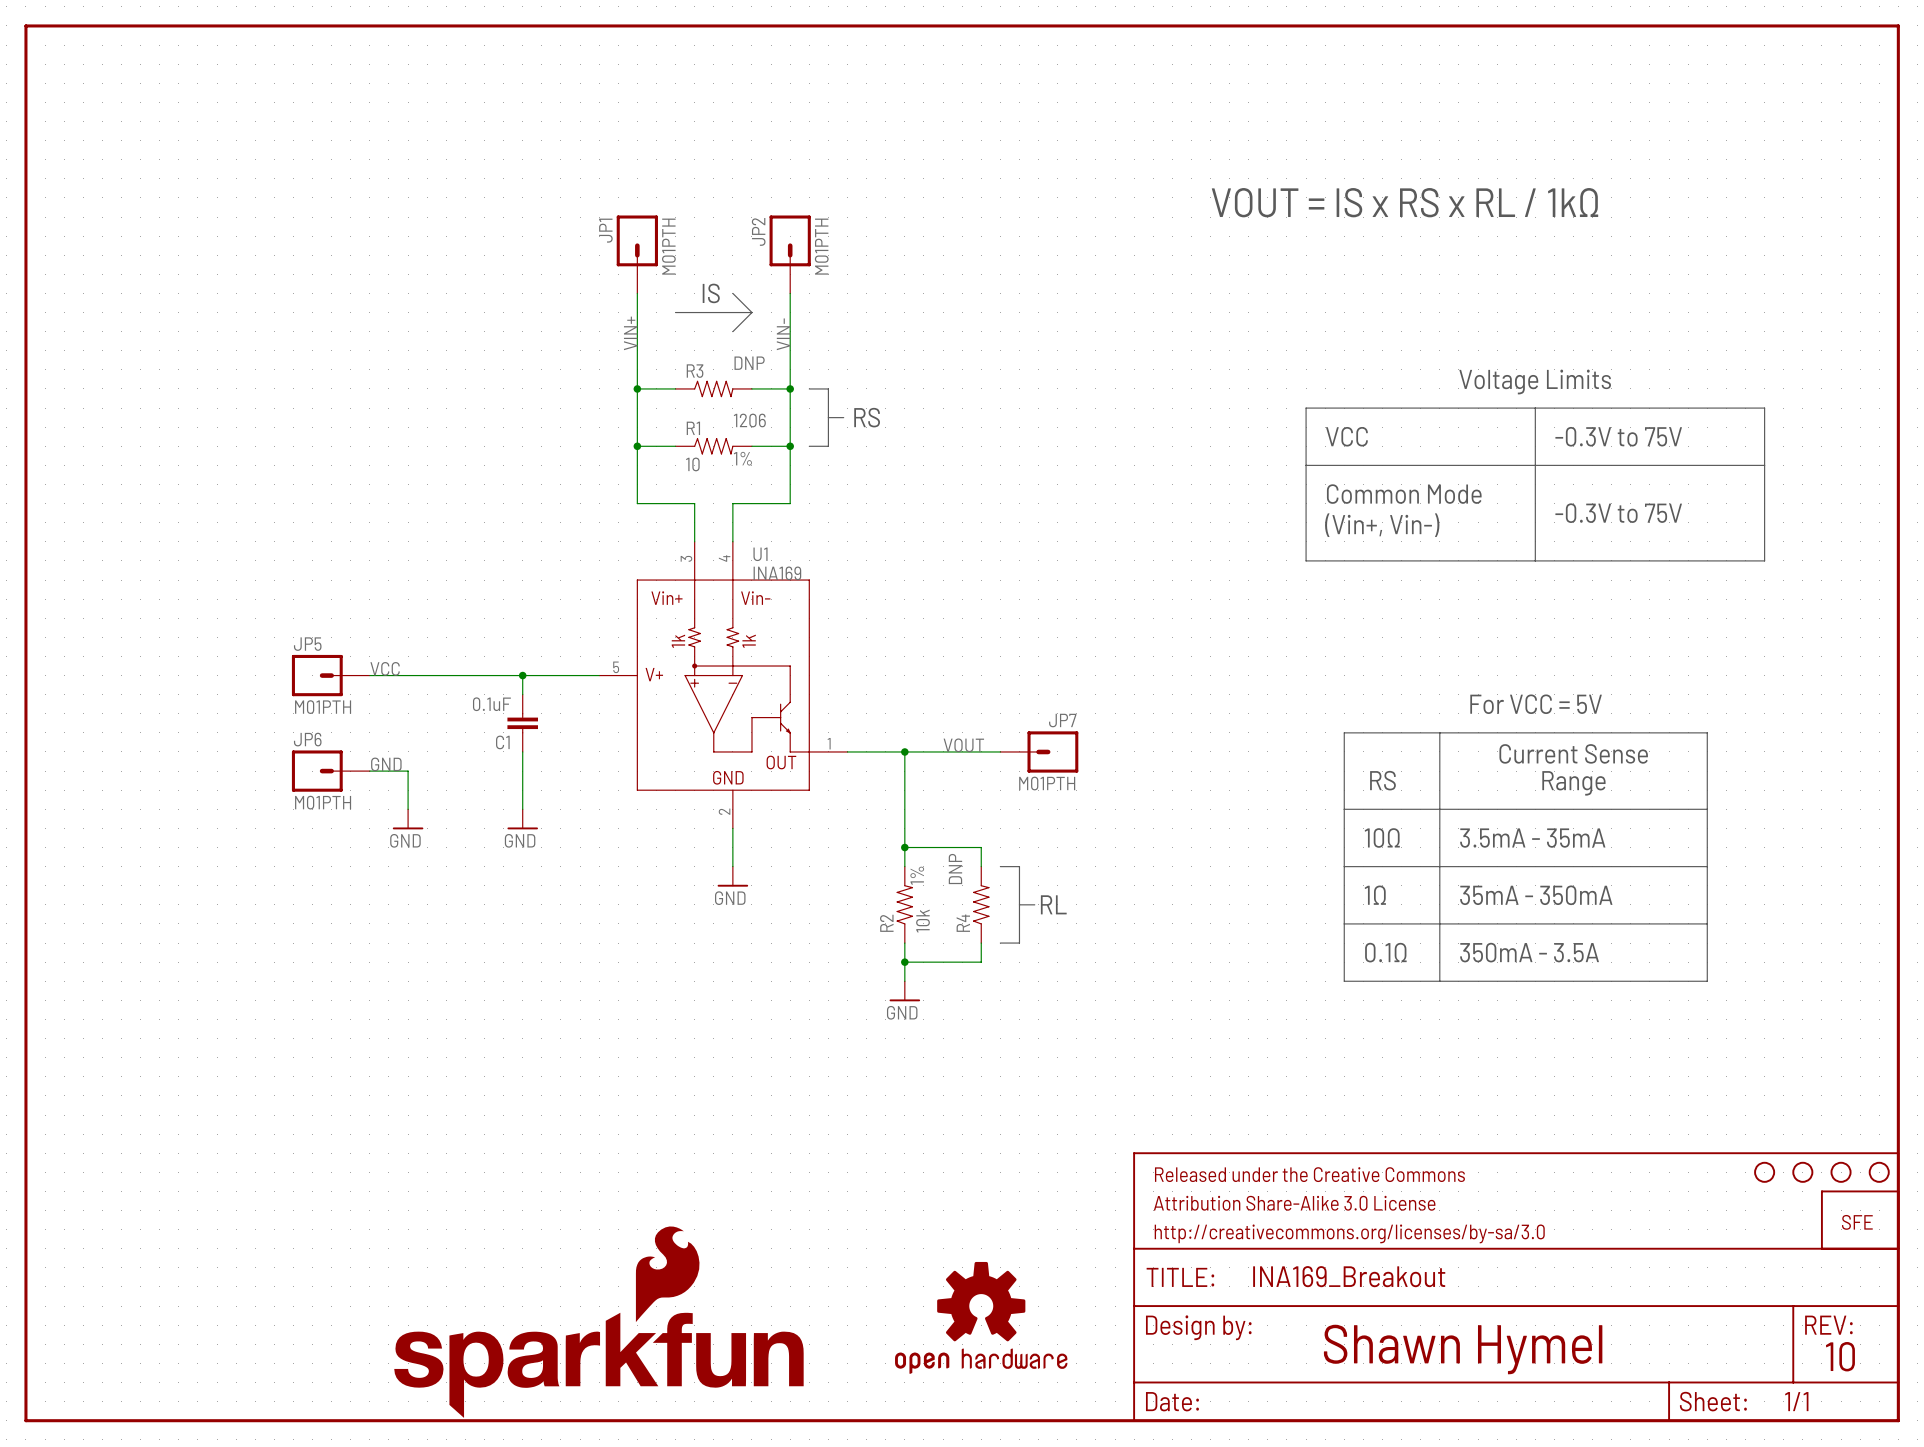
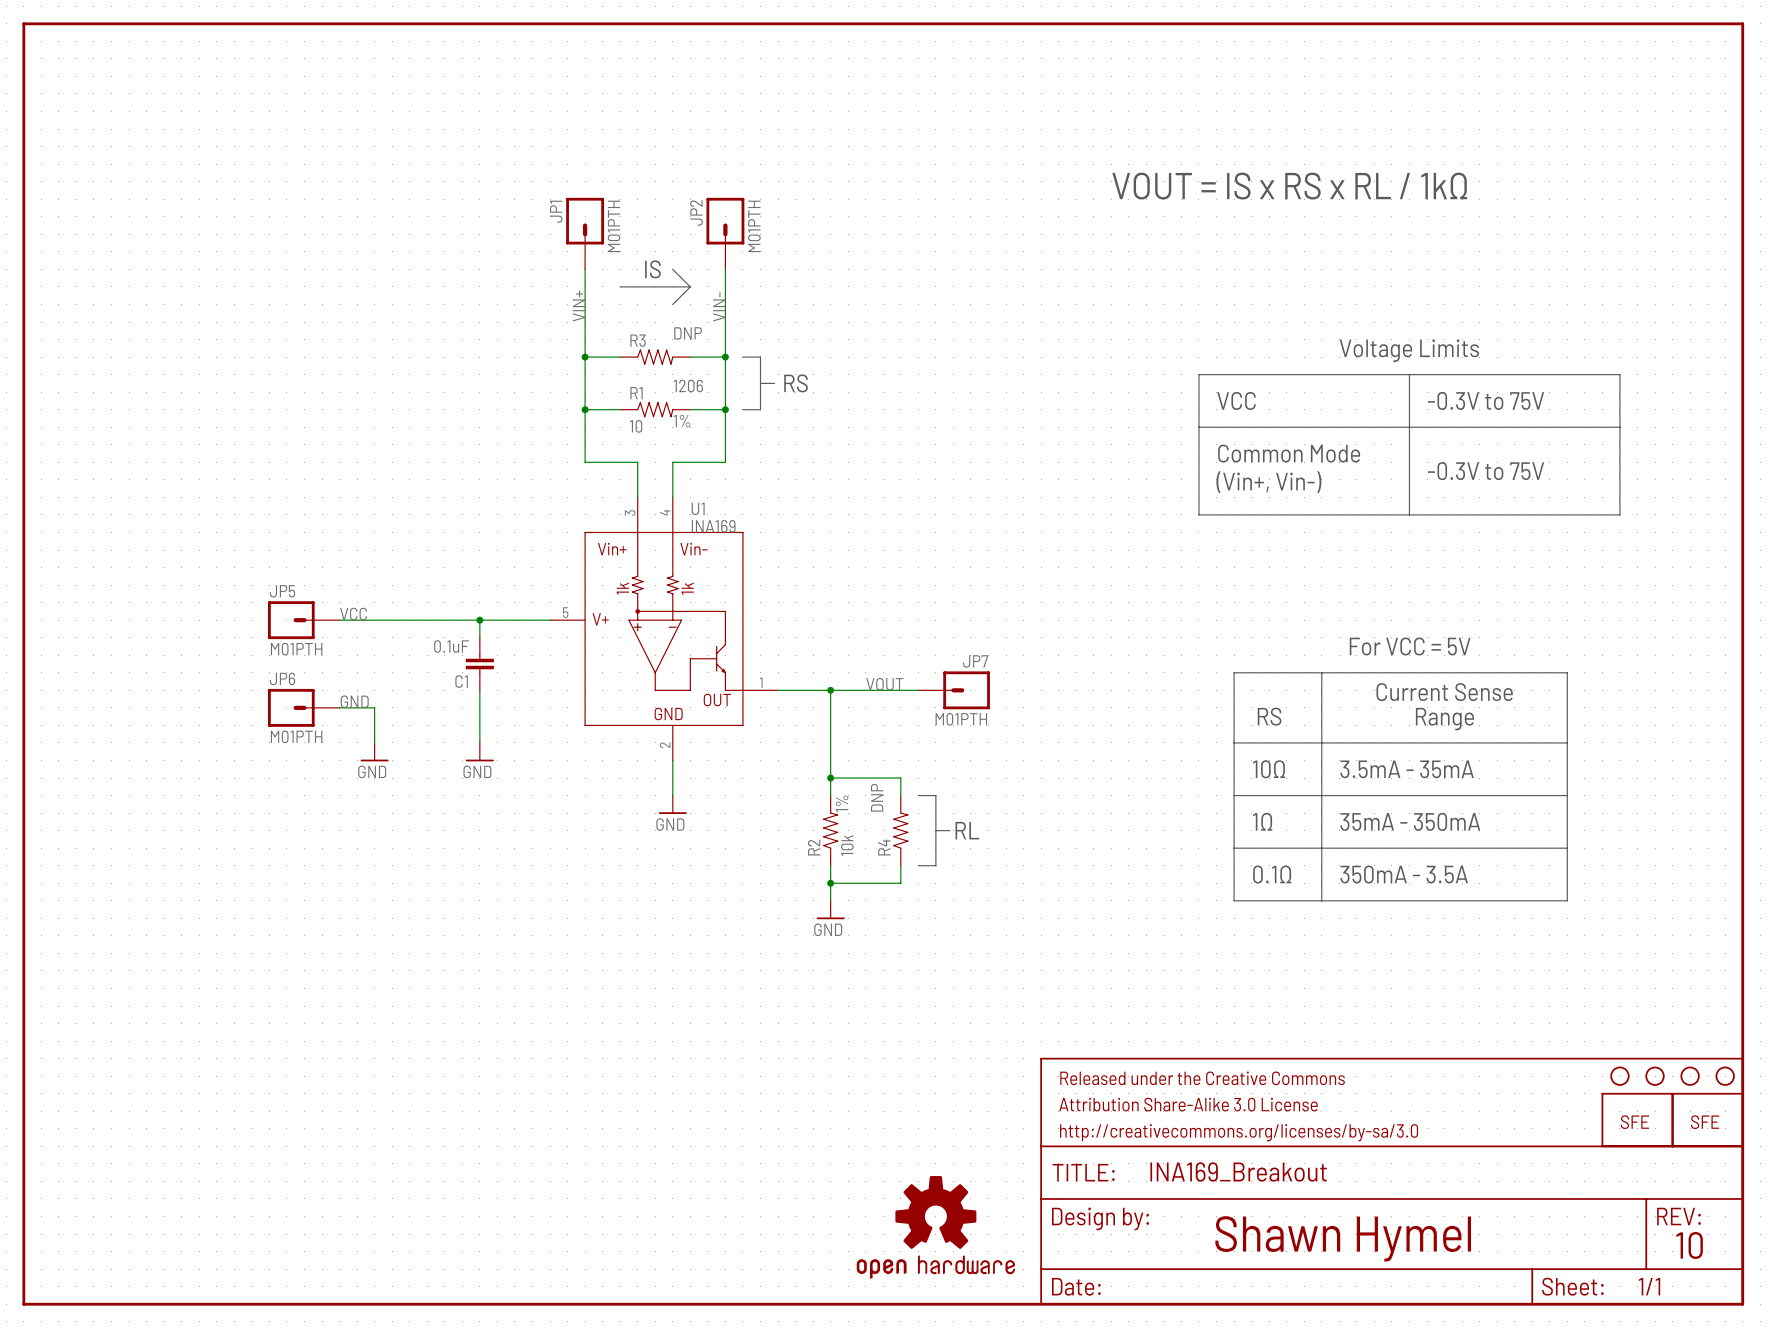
part: none -> (1637, 1120)
part position: (981, 1317) -> (935, 1227)
part: (598, 1322) -> none

